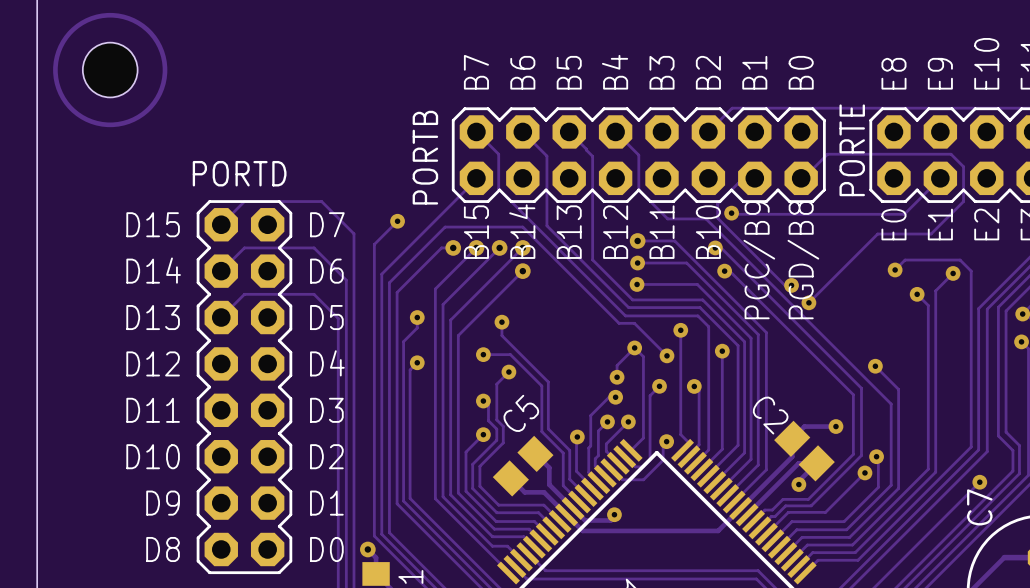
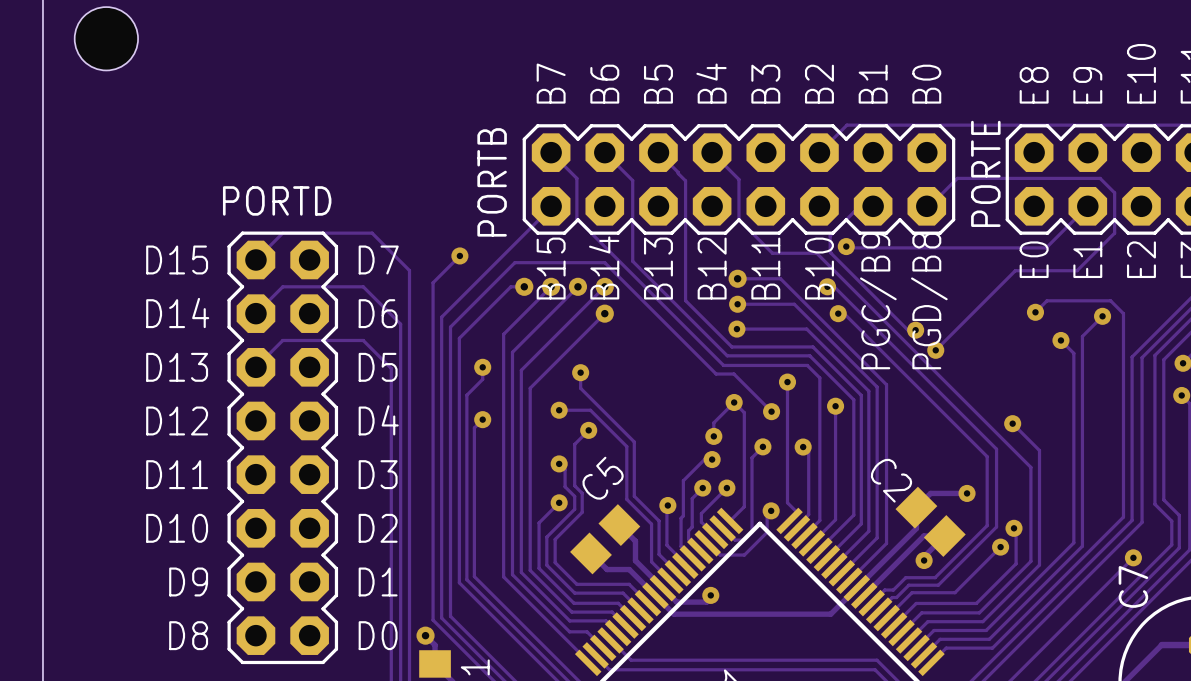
drawing: [53, 12, 168, 128] -> none
hole position: (110, 70) -> (106, 38)

